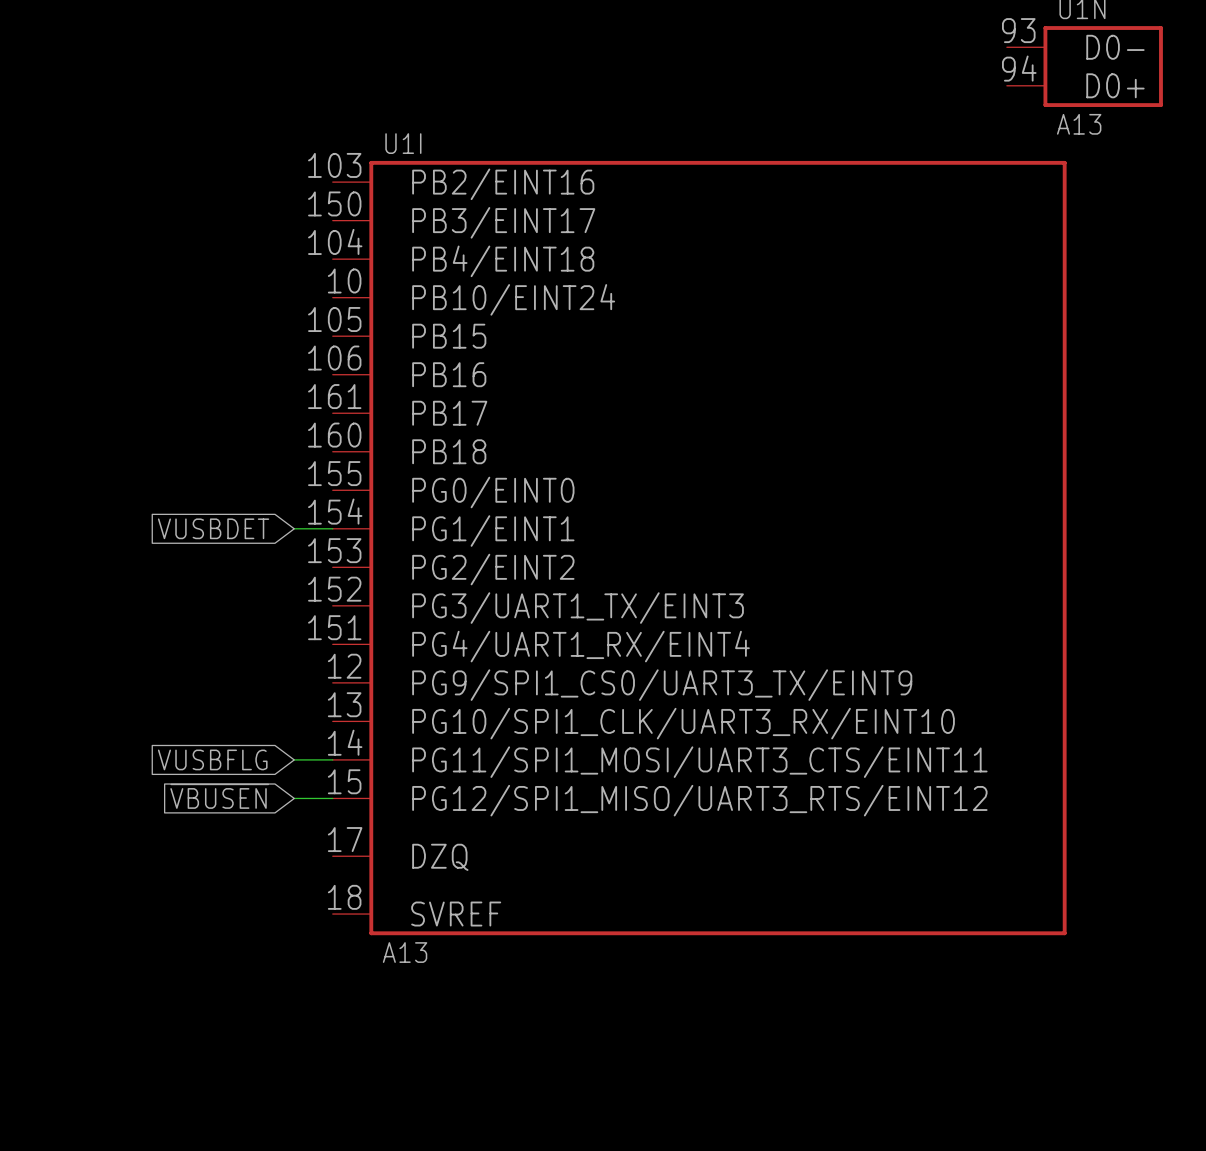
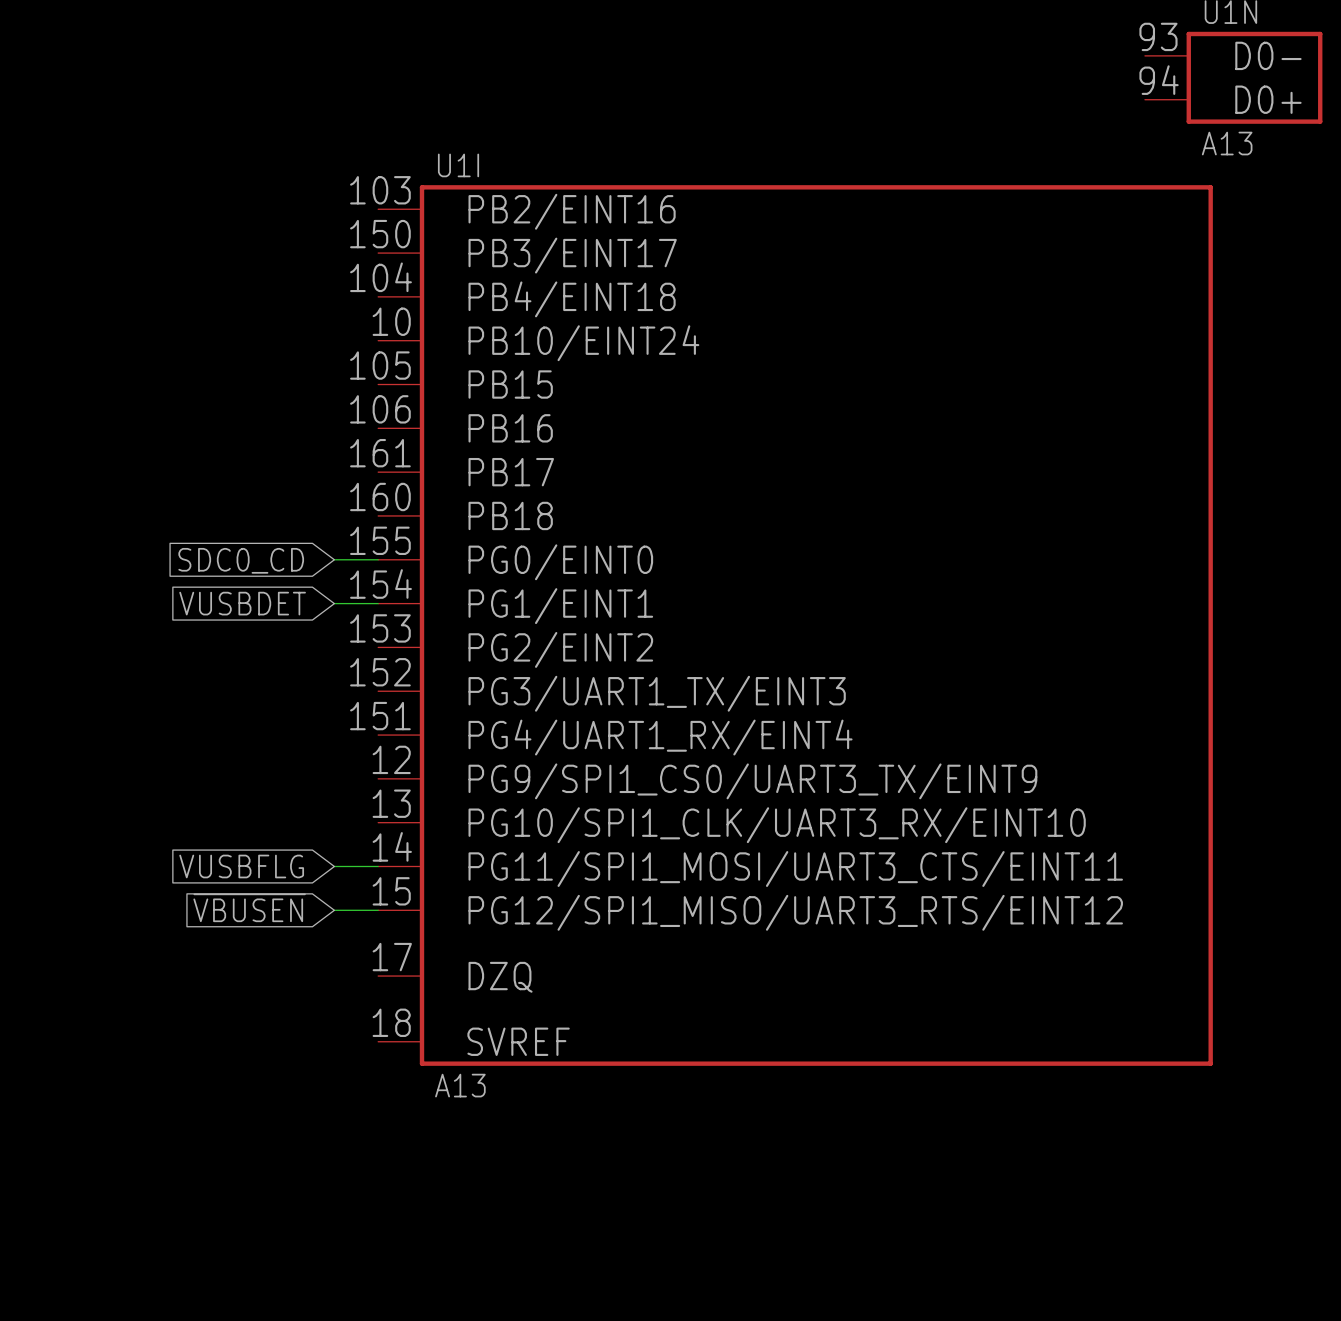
wire: none -> (334, 559) (378, 559)
global label: none -> SDC0_CD (241, 560)

